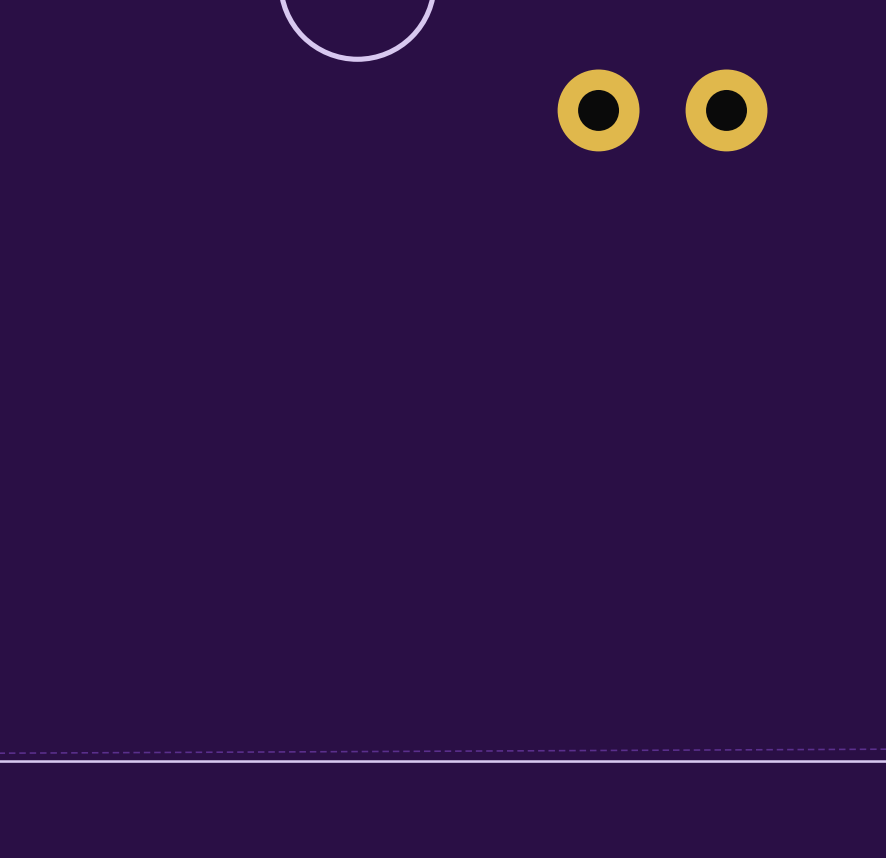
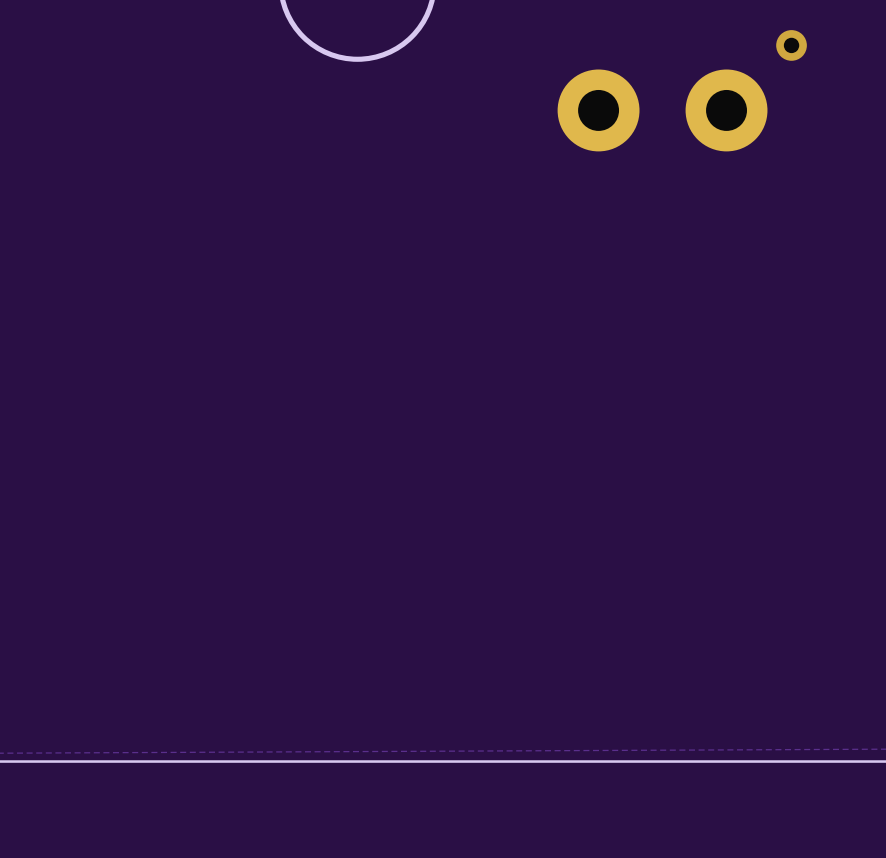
via: none -> (791, 45)

